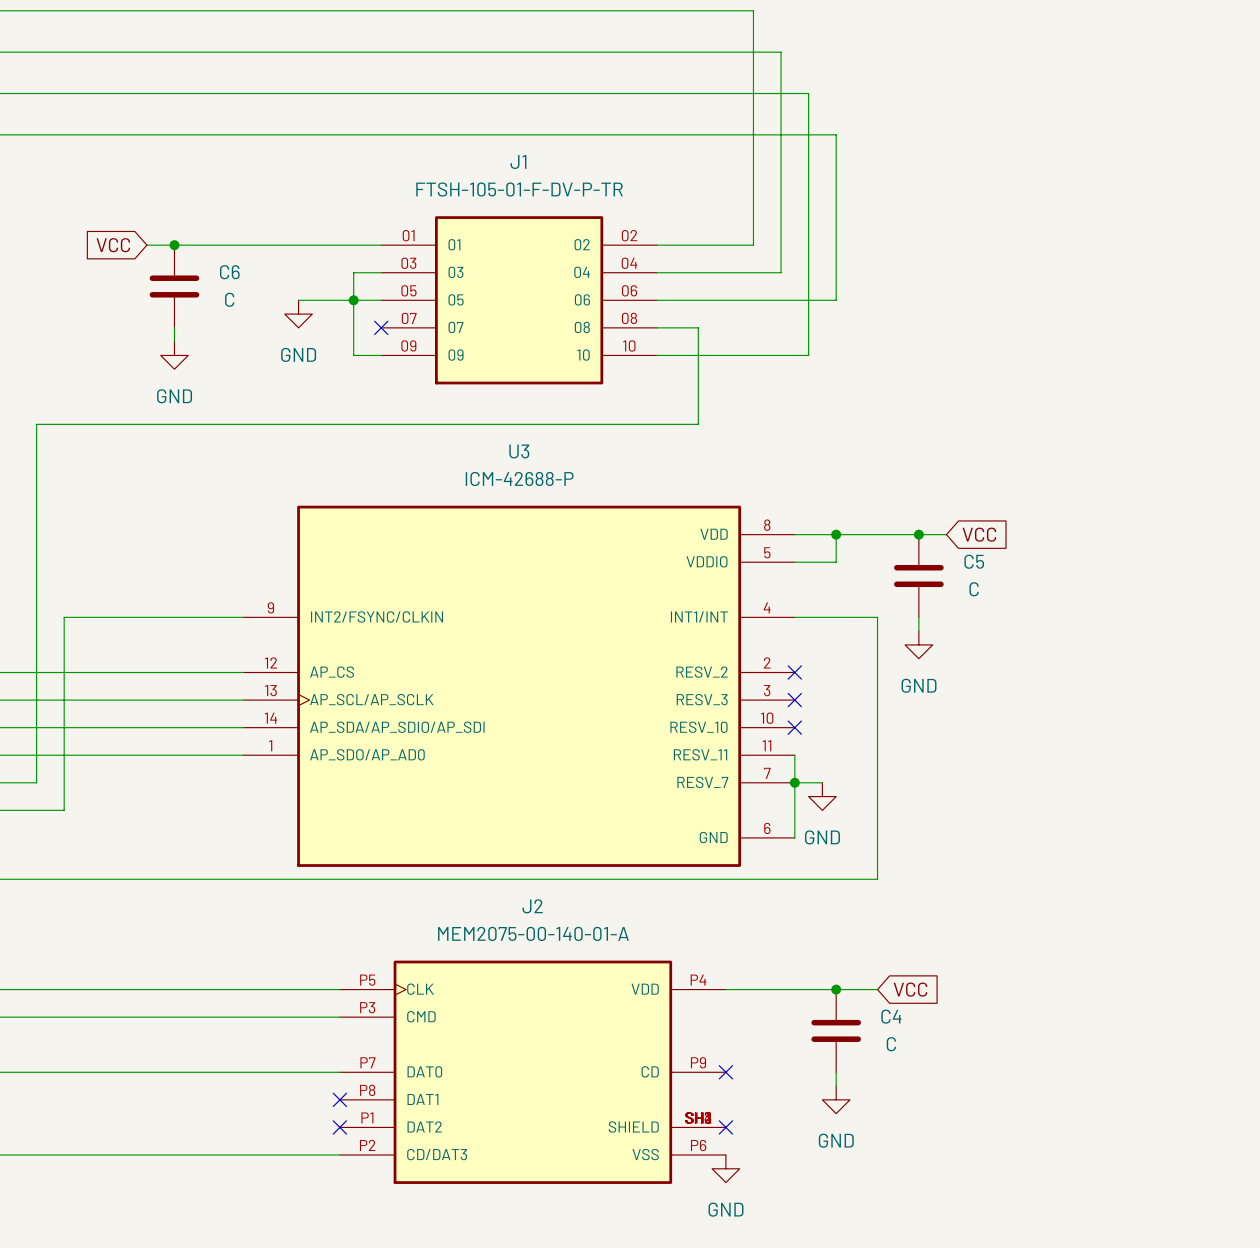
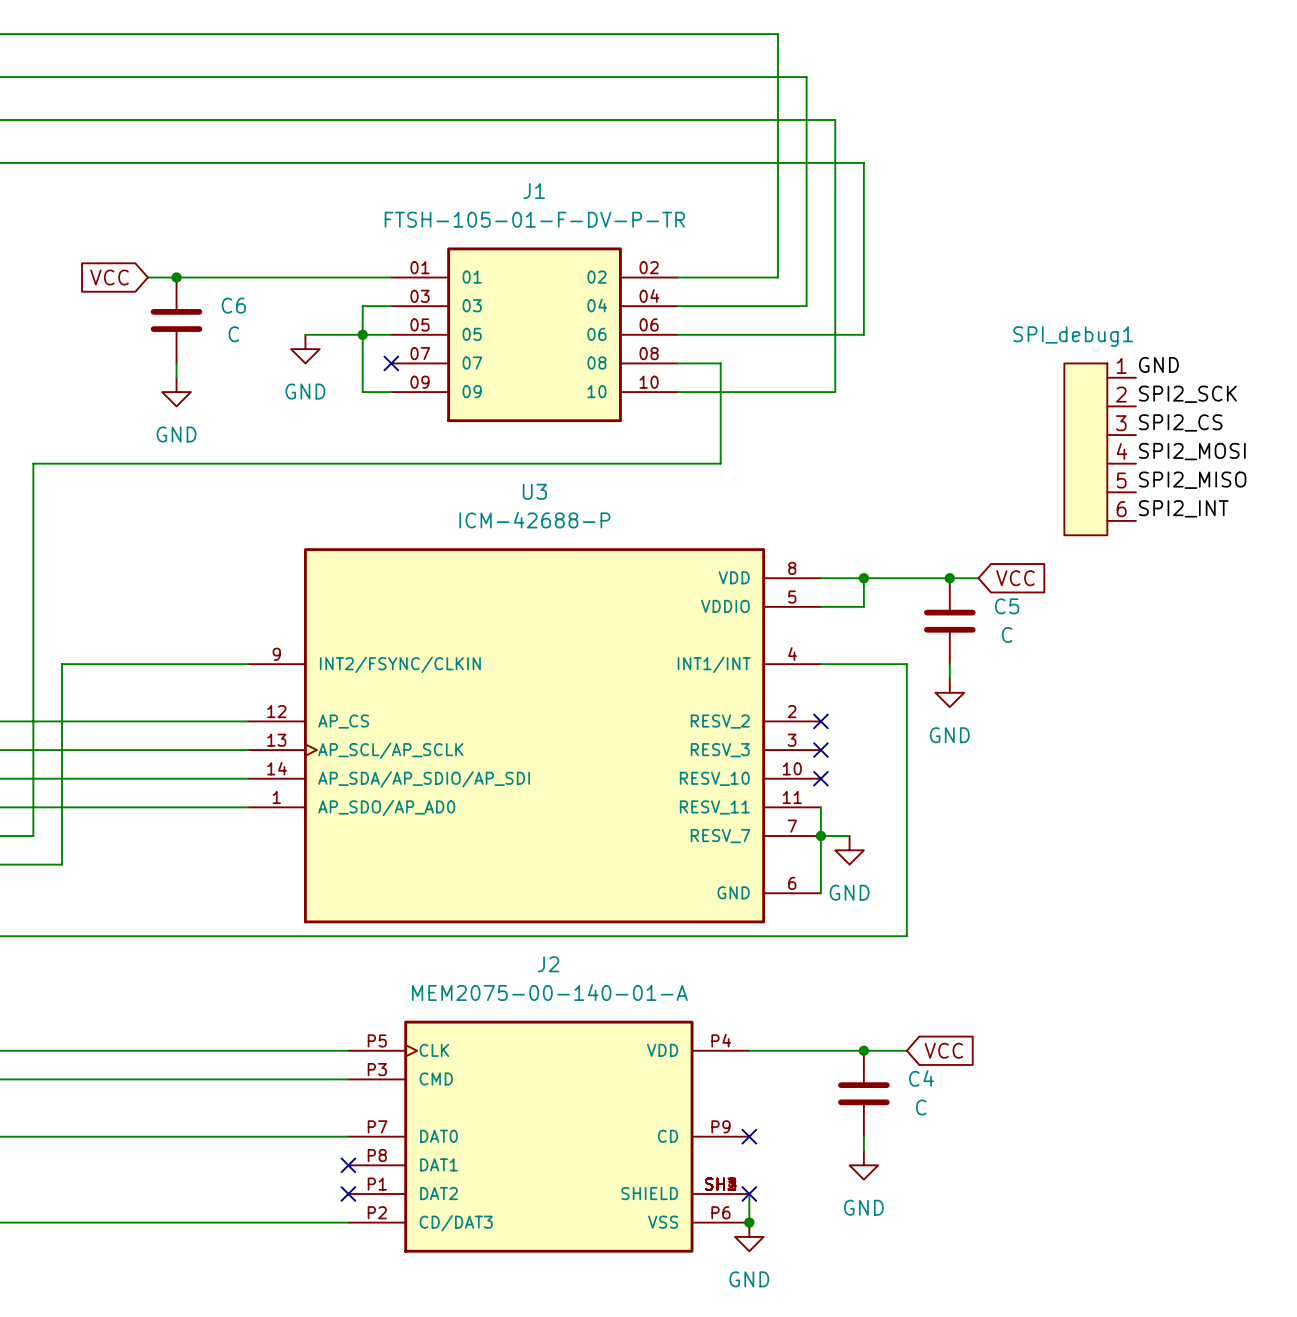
label: none -> GND (1158, 364)
label: none -> SPI2_SCK (1187, 394)
label: none -> SPI2_CS (1180, 422)
SPI_debug1: none -> (1100, 449)
label: none -> SPI2_MOSI (1192, 451)
label: none -> SPI2_MISO (1192, 480)
label: none -> SPI2_INT (1183, 508)
wire: none -> (749, 1193) (749, 1222)
junction: none -> (749, 1222)

